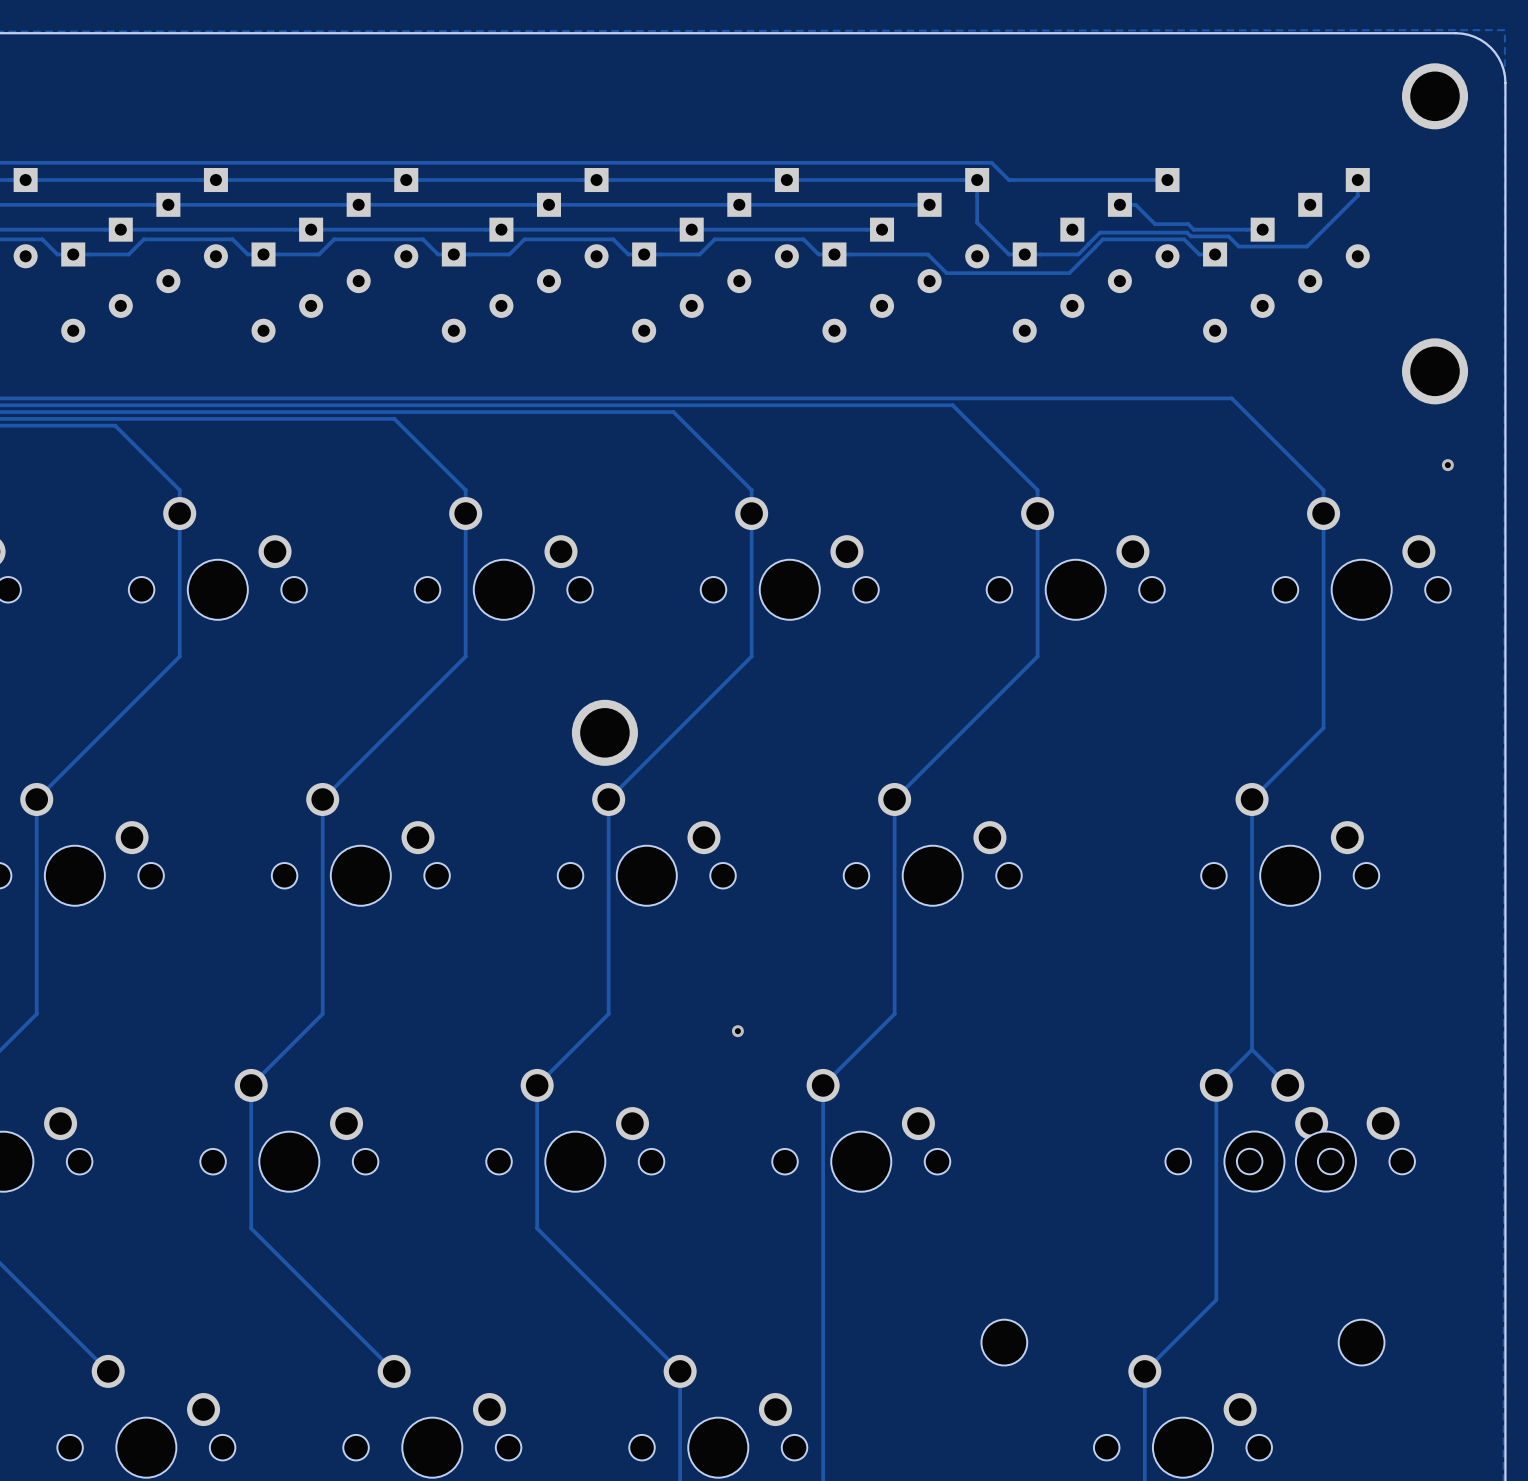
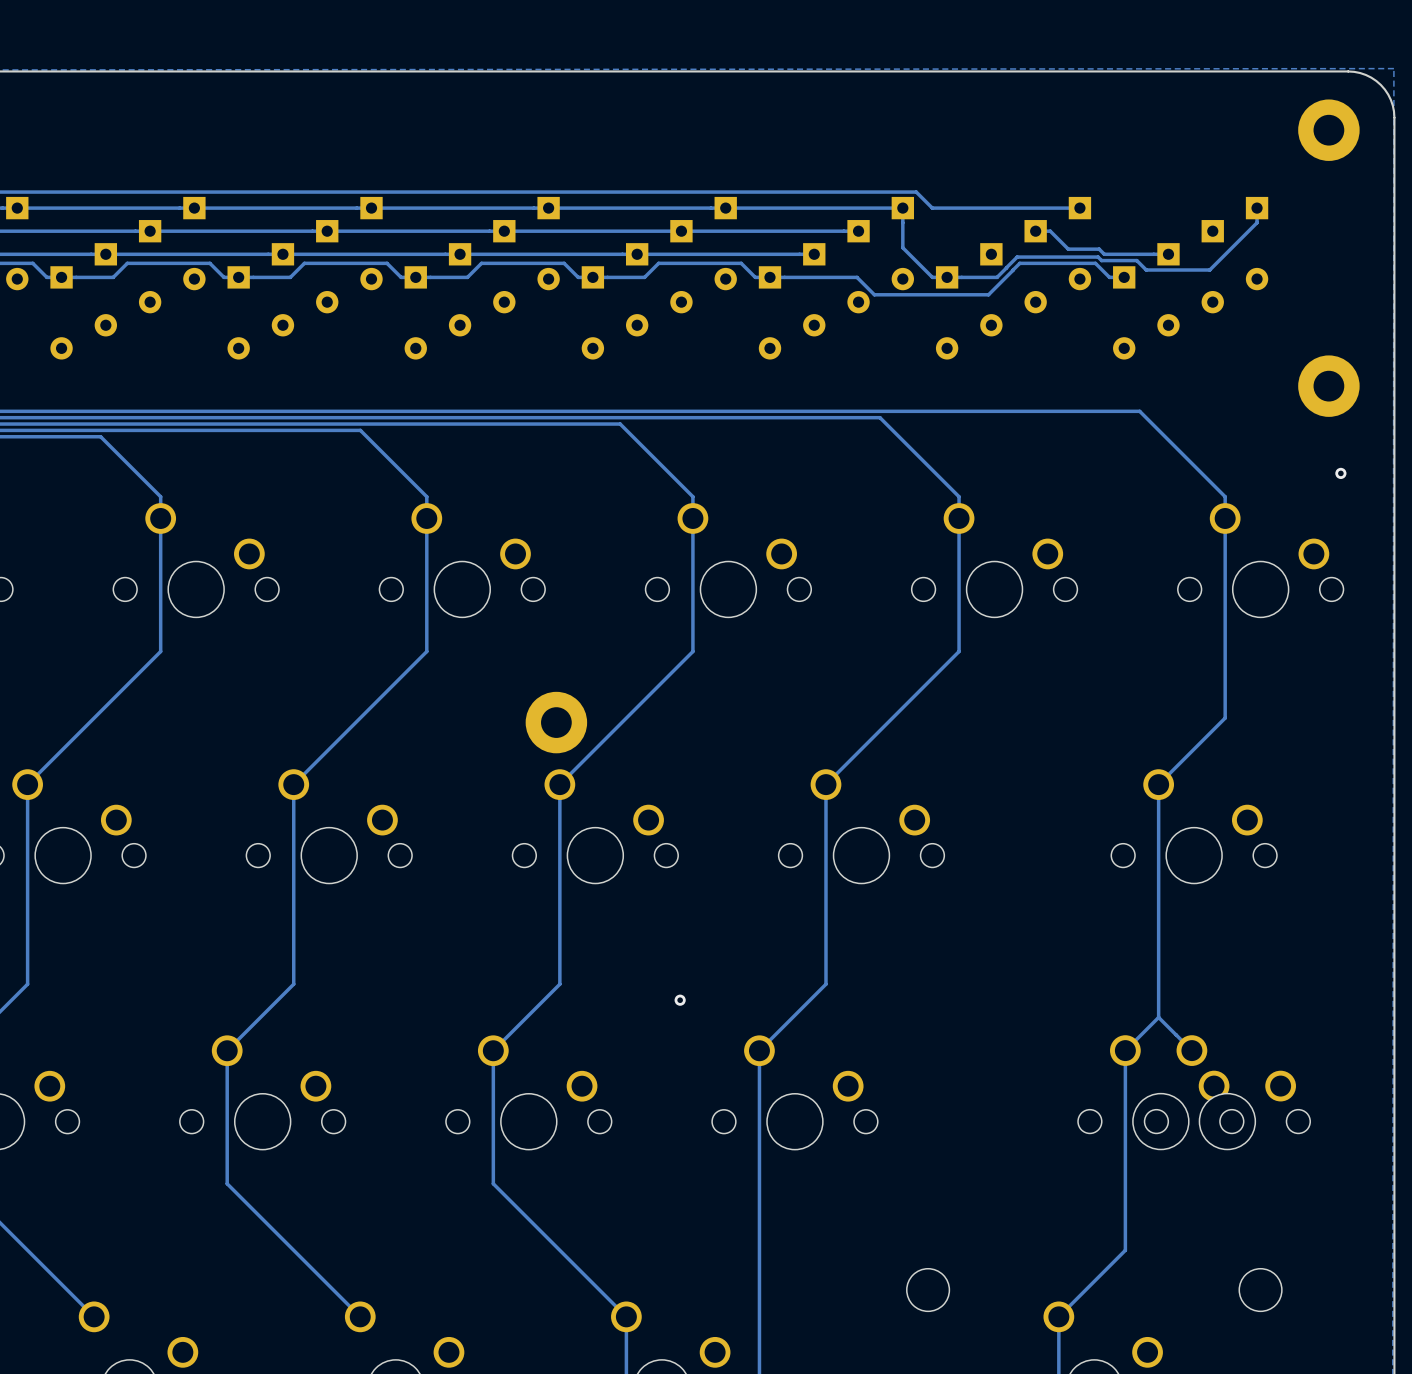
part footprint: [1402, 63, 1469, 130] -> [1298, 99, 1360, 161]
part footprint: [1402, 338, 1469, 405] -> [1298, 355, 1360, 417]
part footprint: [571, 699, 638, 766] -> [525, 691, 588, 754]

